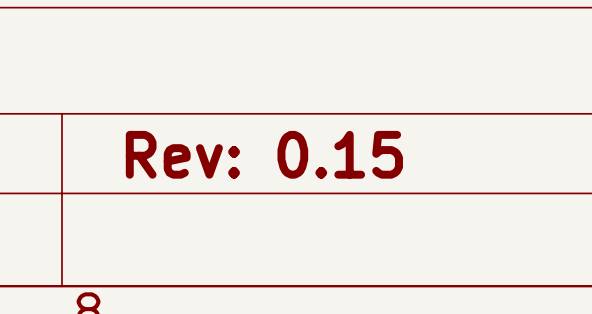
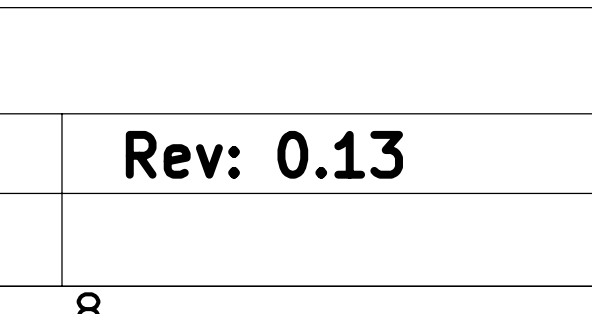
title block: Rev: 0.15 (264, 154) -> Rev: 0.13 (264, 154)

